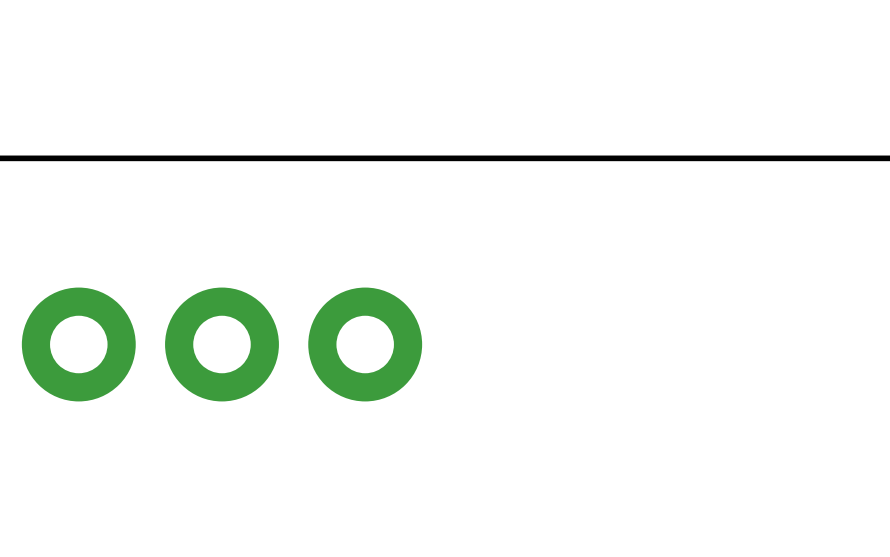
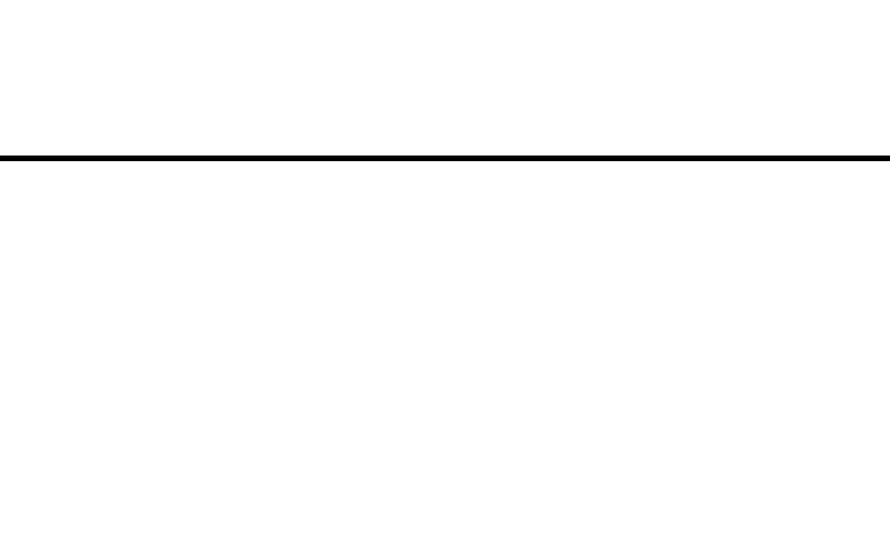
part: (221, 344) -> none

